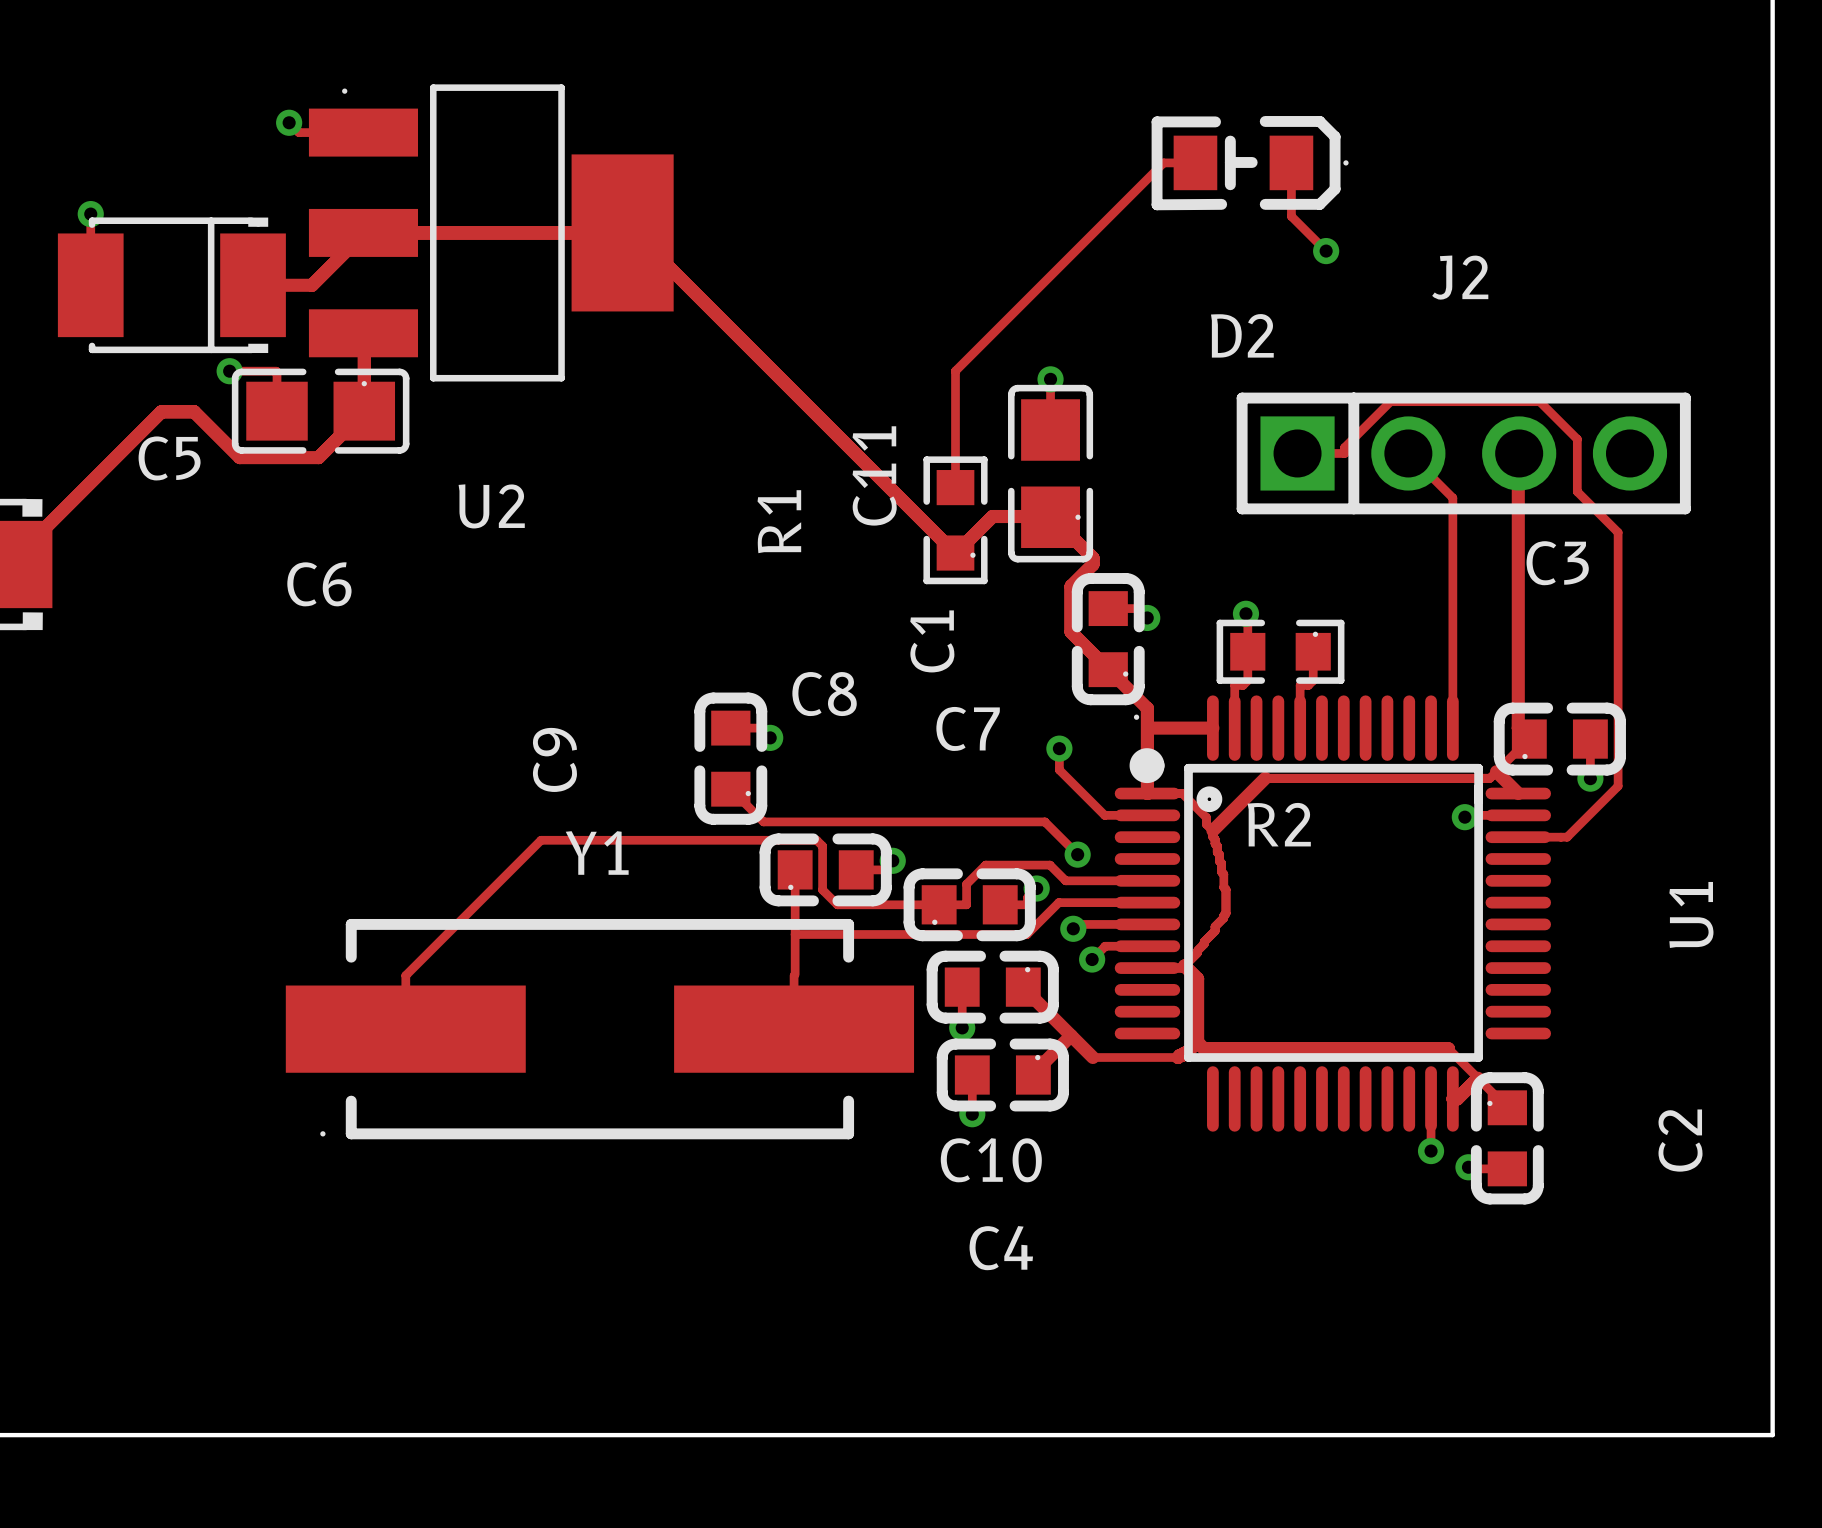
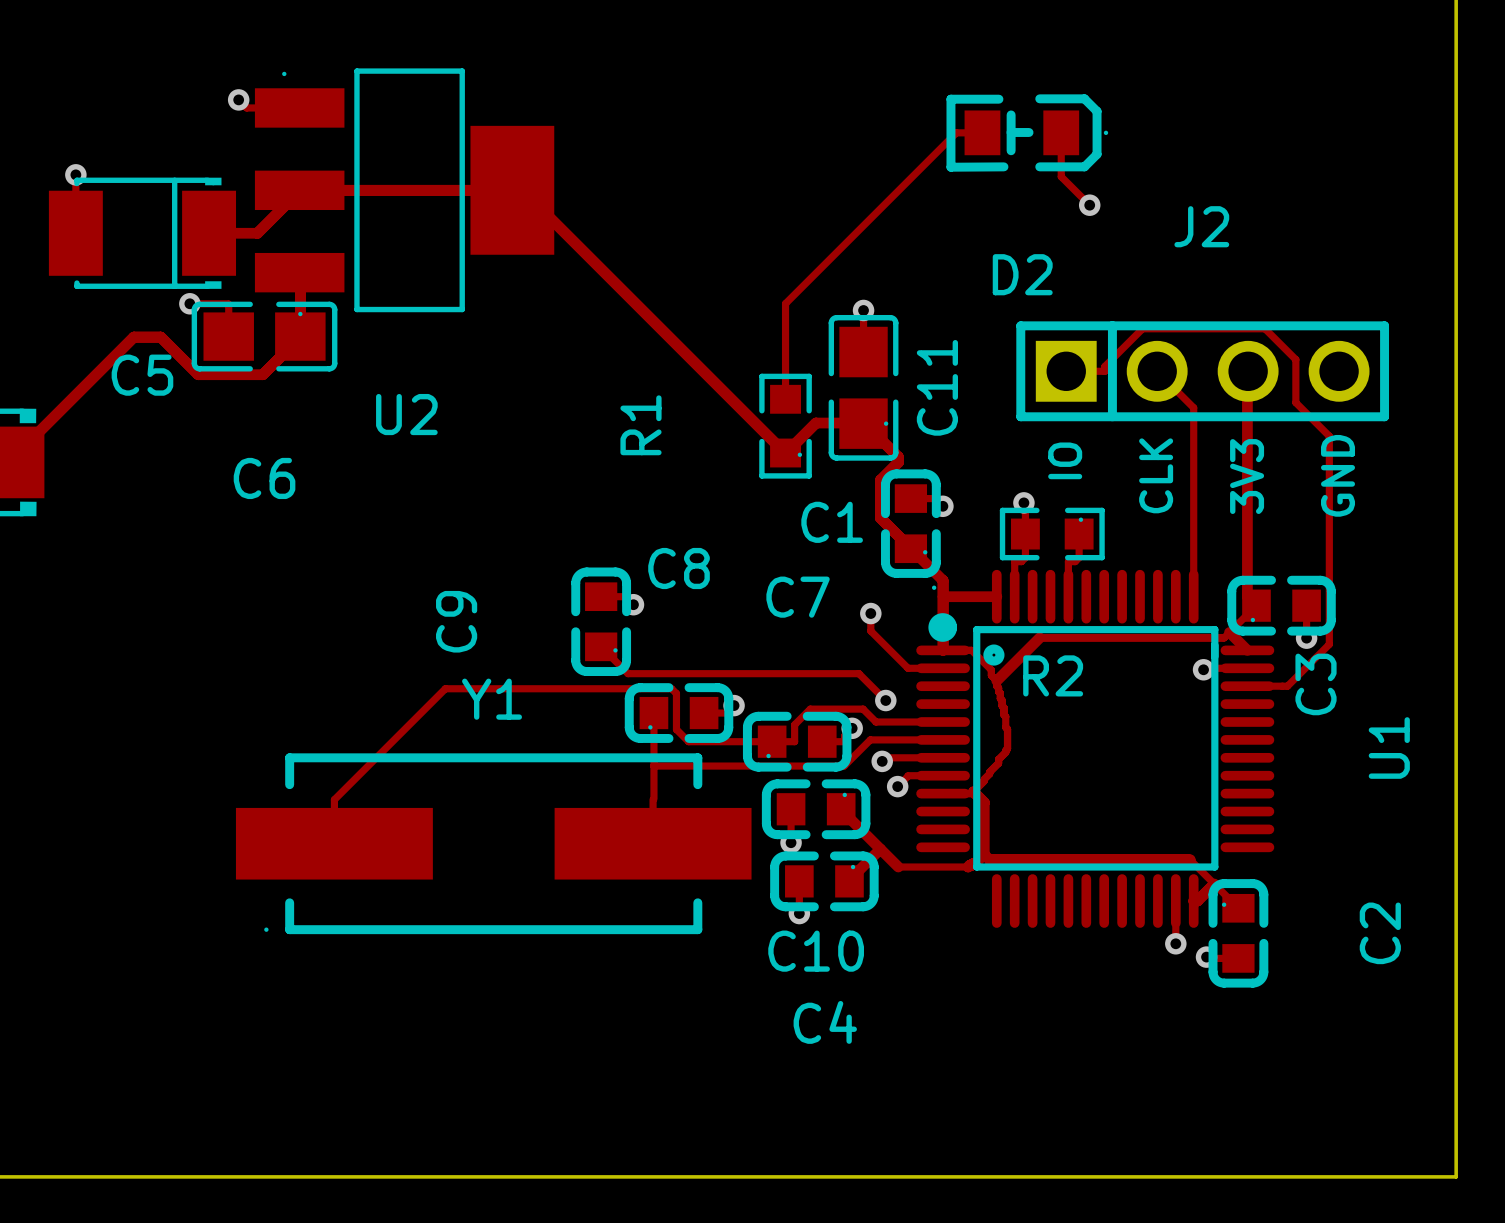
C11 name position: C11 (874, 475) -> C11 (937, 387)
text: none -> IO (1065, 460)
C3 name rotation: 0° (1557, 563) -> 90° counterclockwise (1316, 684)
C3 name position: C3 (1557, 563) -> C3 (1316, 684)
text: none -> CLK (1156, 475)
text: none -> GND (1338, 475)
text: none -> 3V3 (1247, 476)
C1 name rotation: 0° (932, 641) -> 90° clockwise (832, 522)

